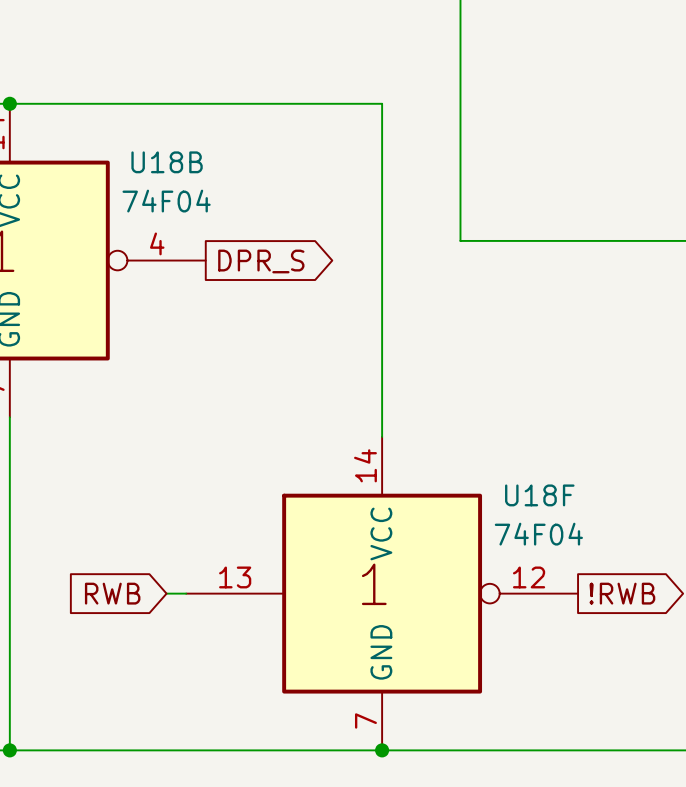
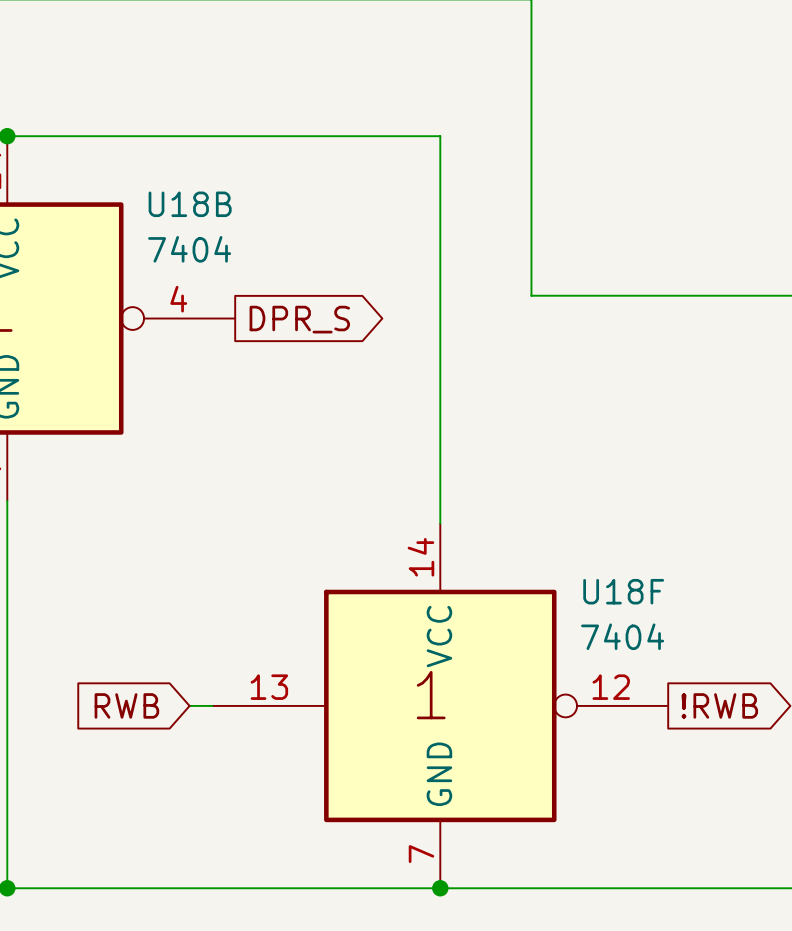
U18B value: 74F04 (166, 201) -> 7404 (189, 249)
U18F value: 74F04 (538, 534) -> 7404 (622, 636)

